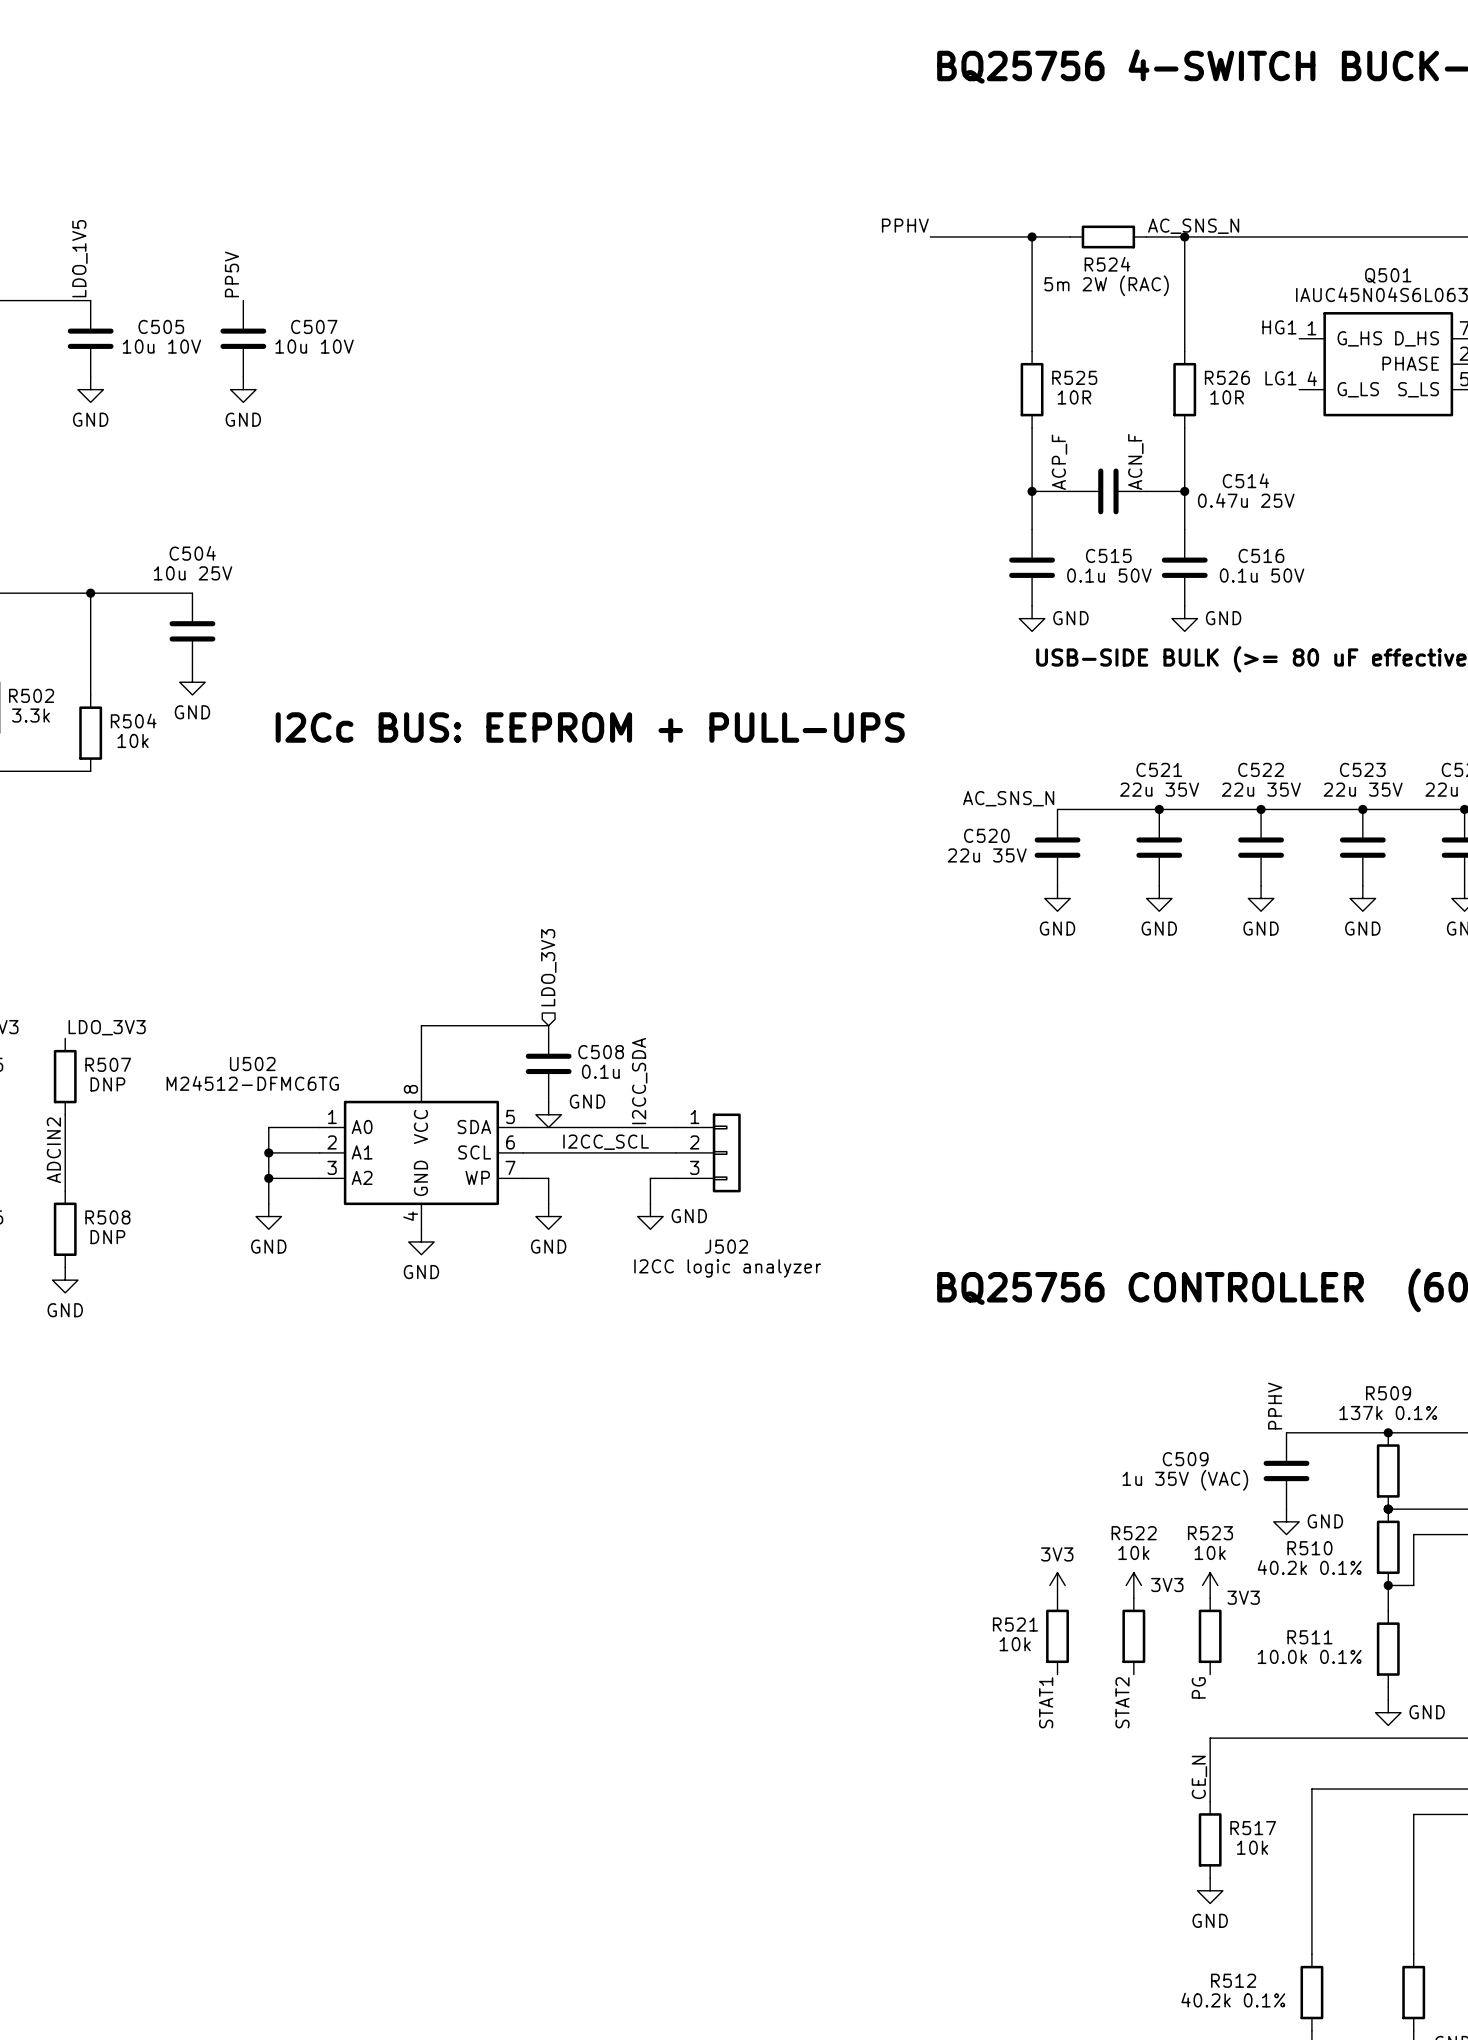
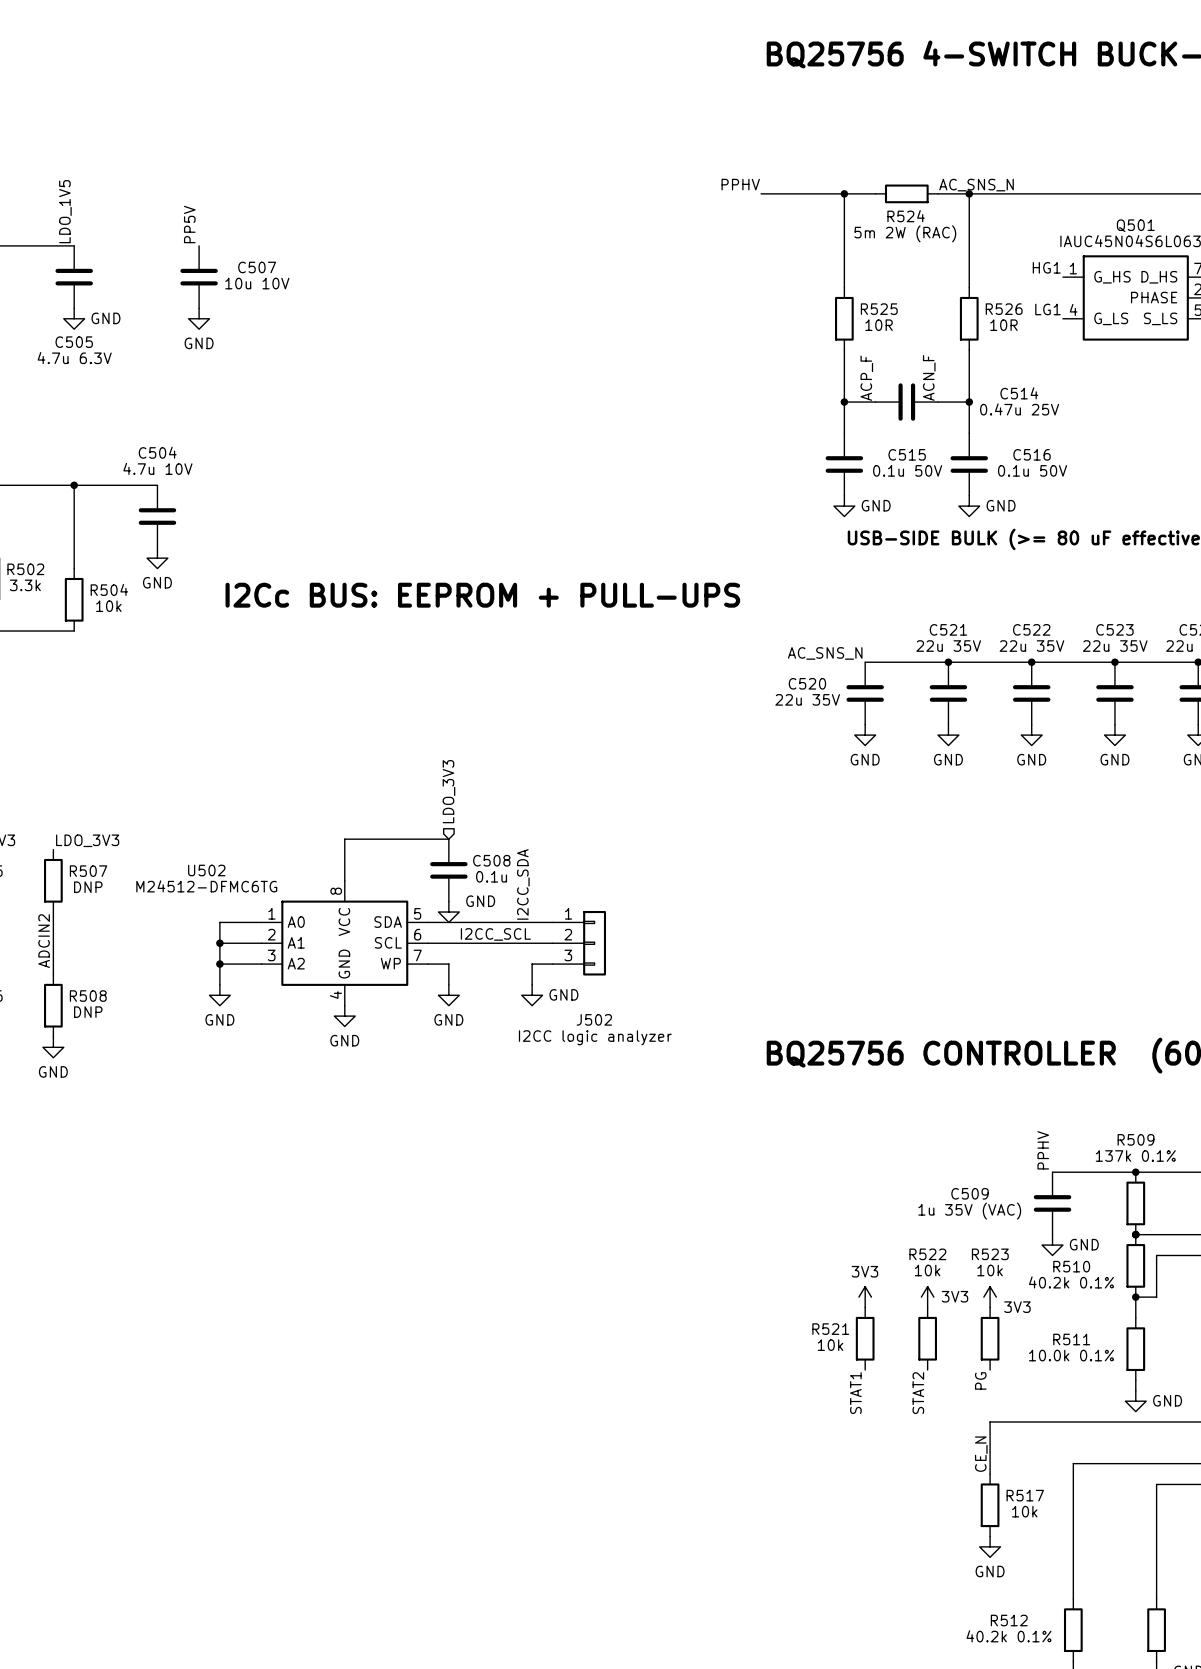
C505 name position: C505 (161, 326) -> C505 (74, 342)
C505 value: 10u 10V (161, 346) -> 4.7u 6.3V (74, 358)
power symbol text position: GND (90, 419) -> GND (105, 318)
C504 value: 10u 25V (193, 573) -> 4.7u 10V (157, 468)

